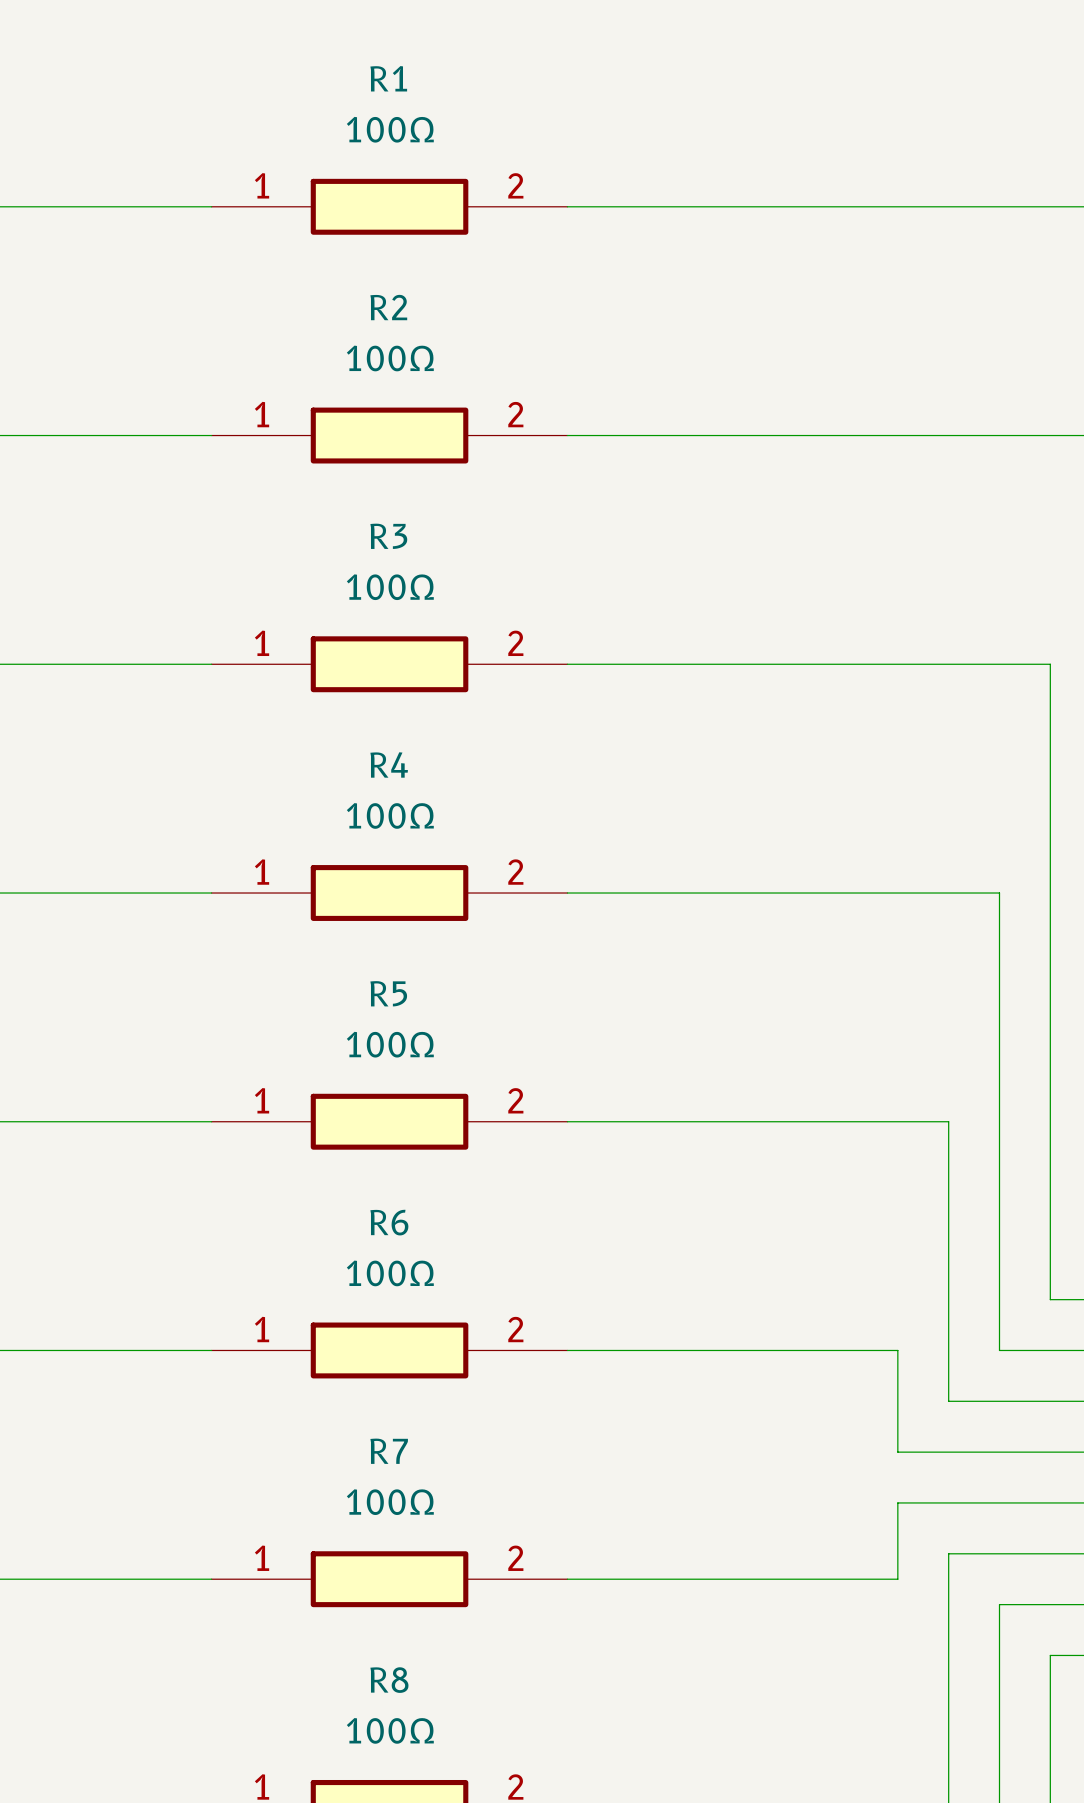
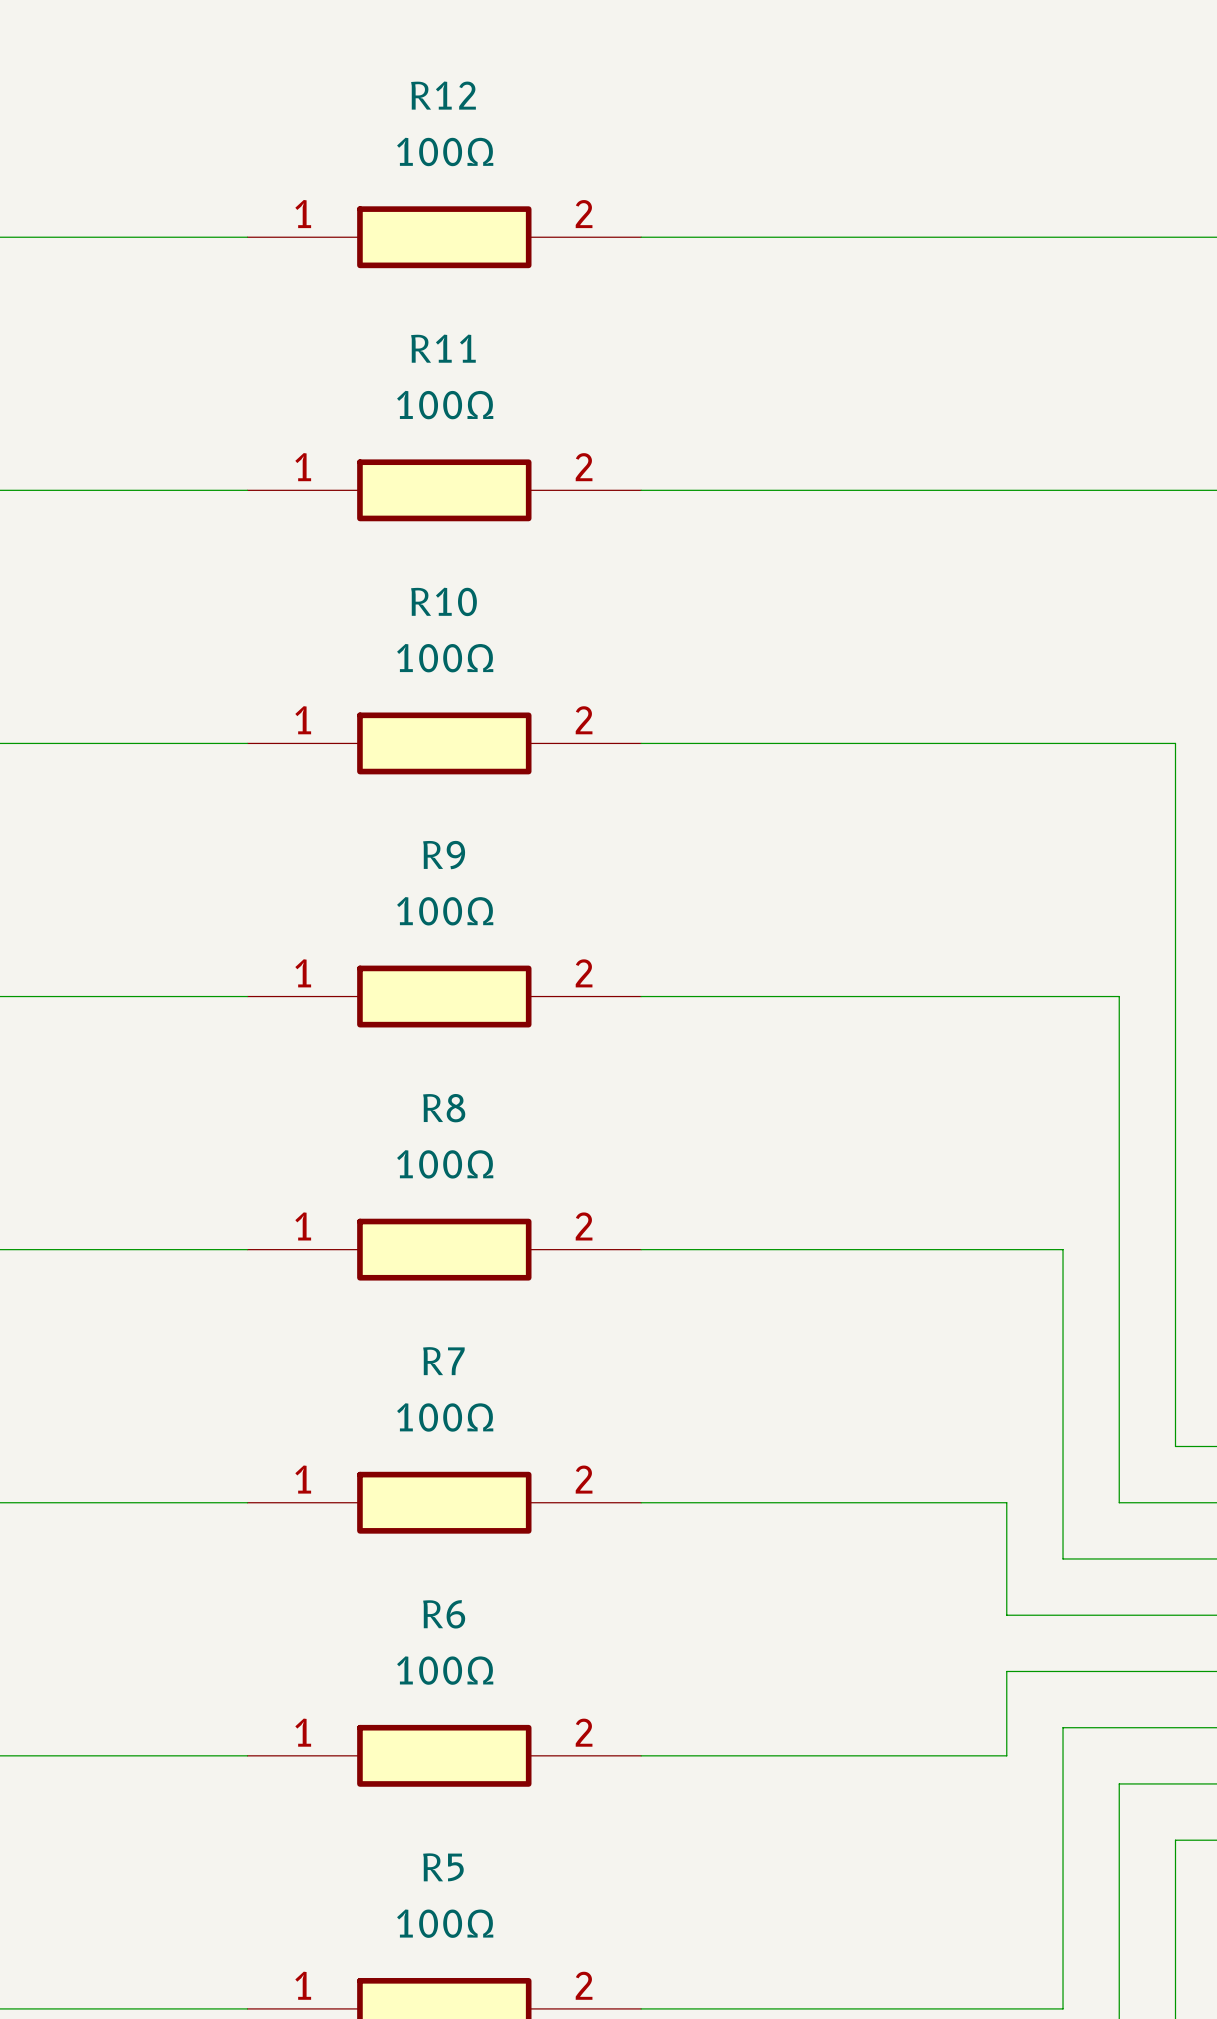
R1 name: R1 (388, 78) -> R12 (443, 95)
R2 name: R2 (388, 307) -> R11 (443, 348)
R3 name: R3 (388, 536) -> R10 (443, 601)
R4 name: R4 (389, 764) -> R9 (444, 855)
R5 name: R5 (388, 993) -> R8 (444, 1108)
R6 name: R6 (389, 1222) -> R7 (443, 1361)
R7 name: R7 (389, 1451) -> R6 (444, 1614)
R8 name: R8 (389, 1680) -> R5 (443, 1867)

